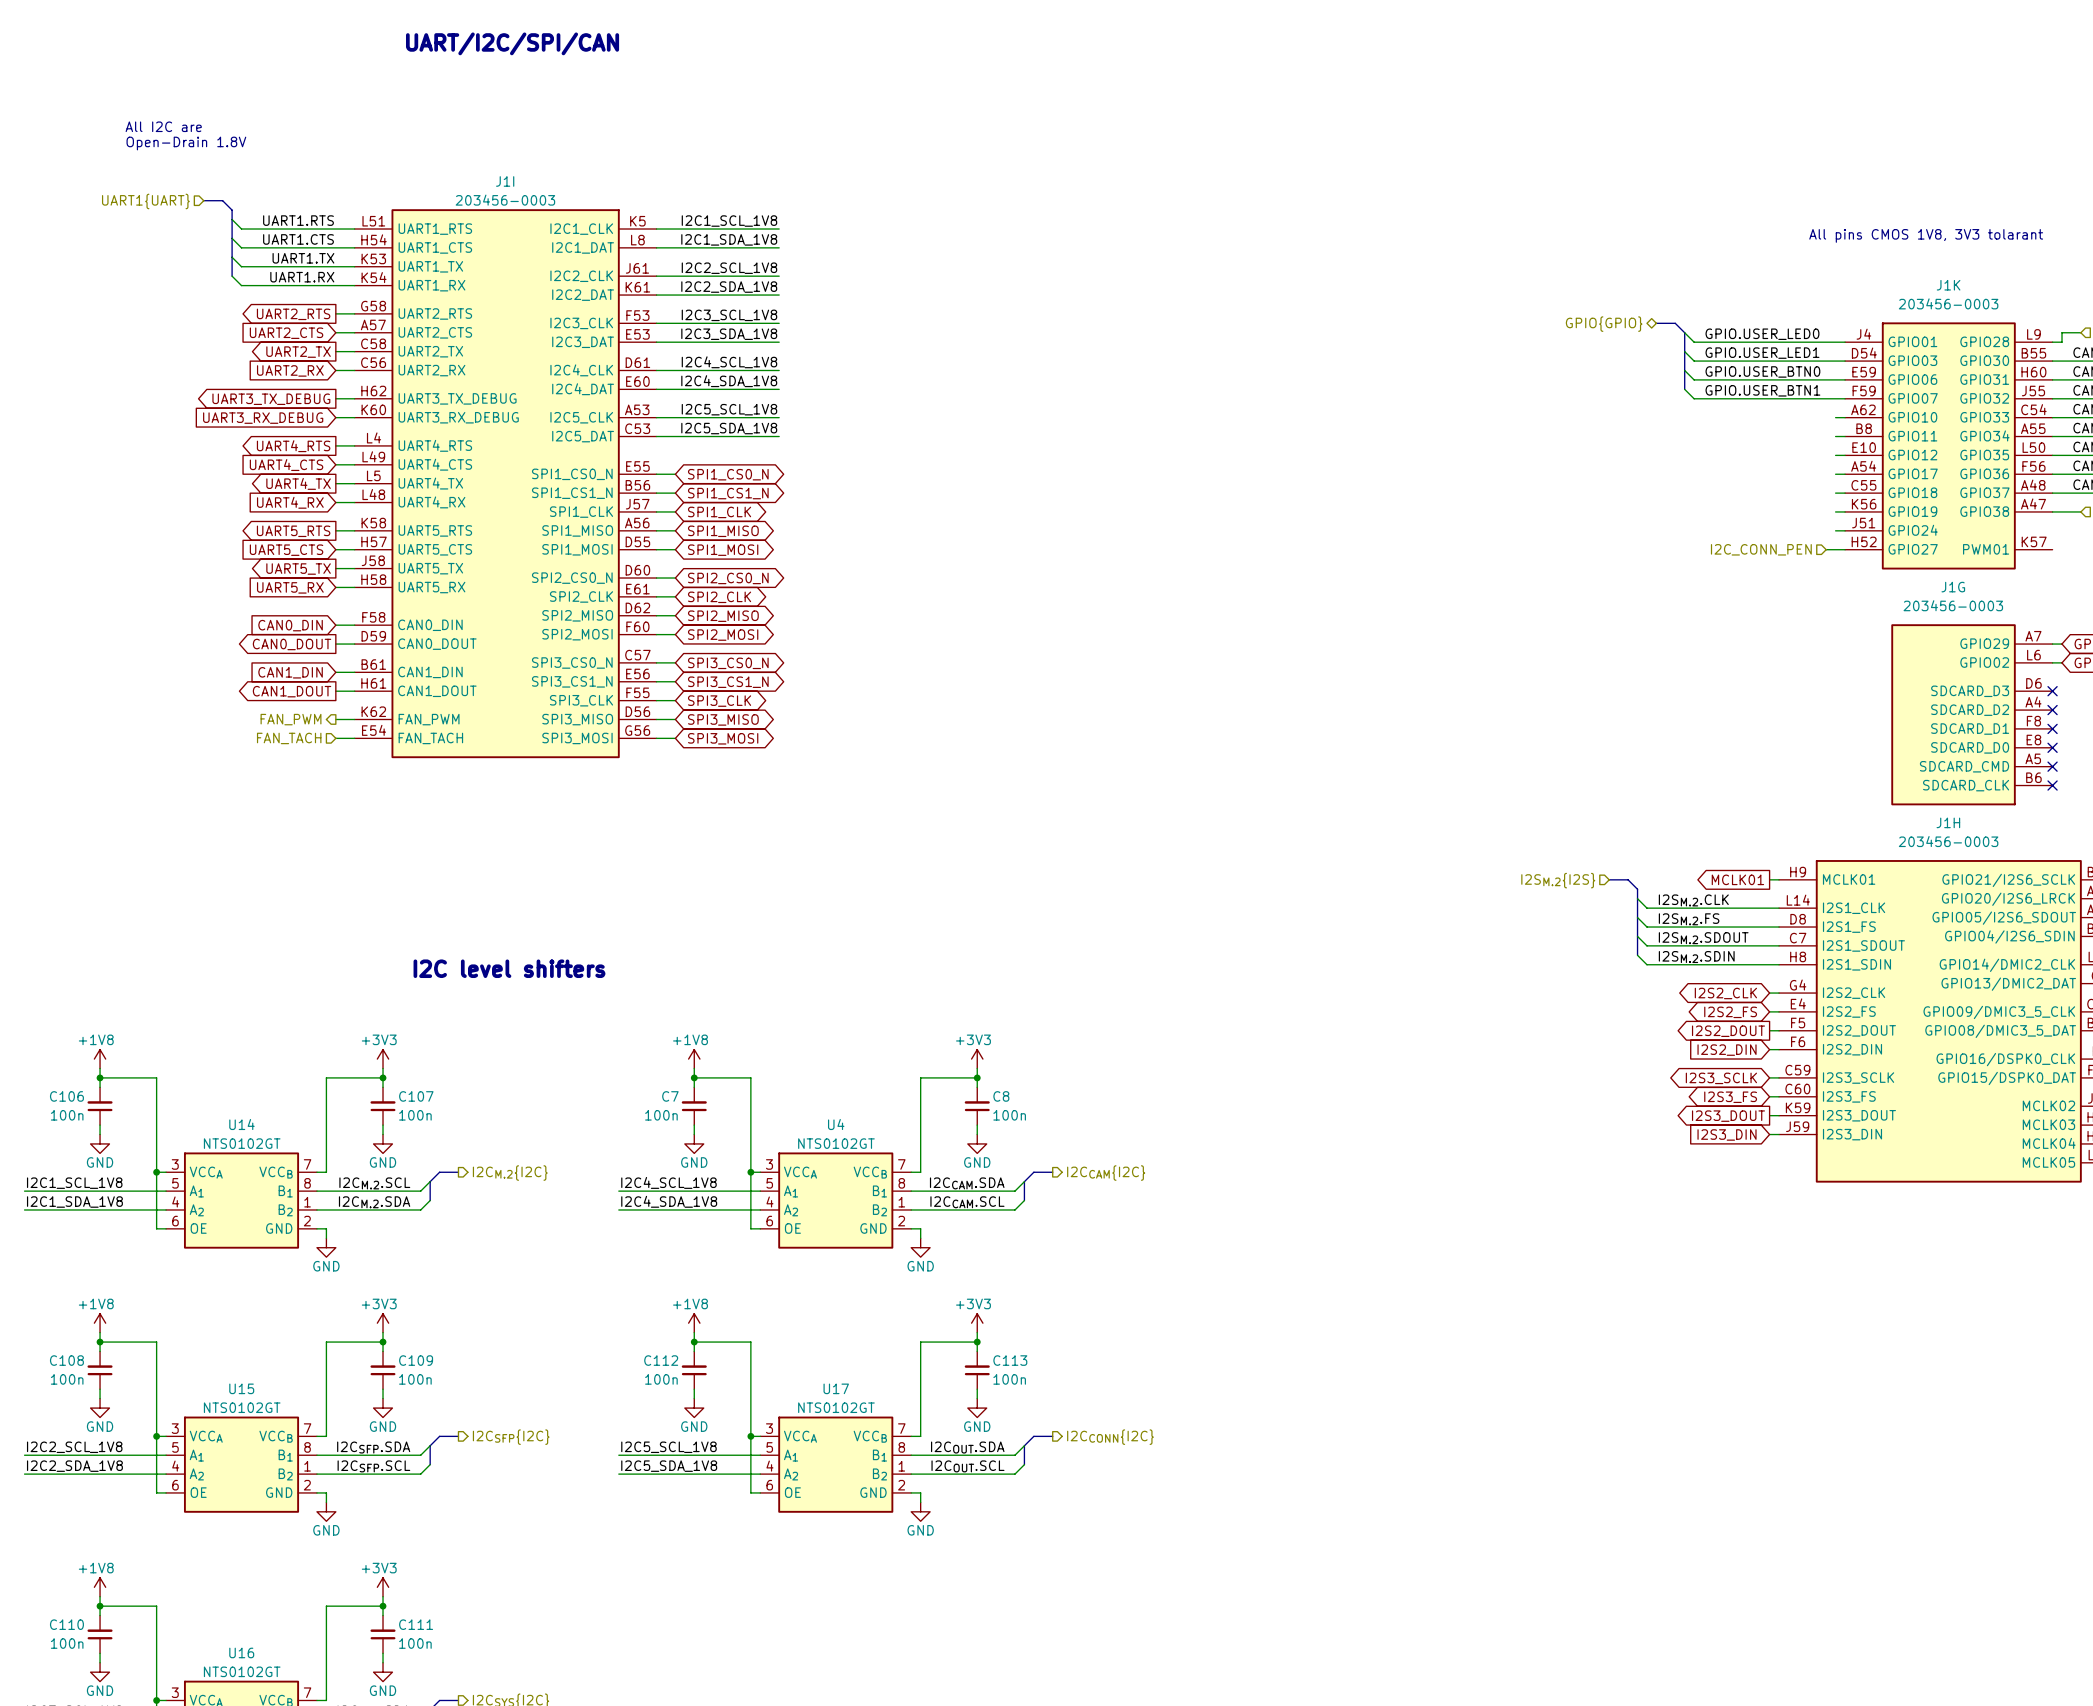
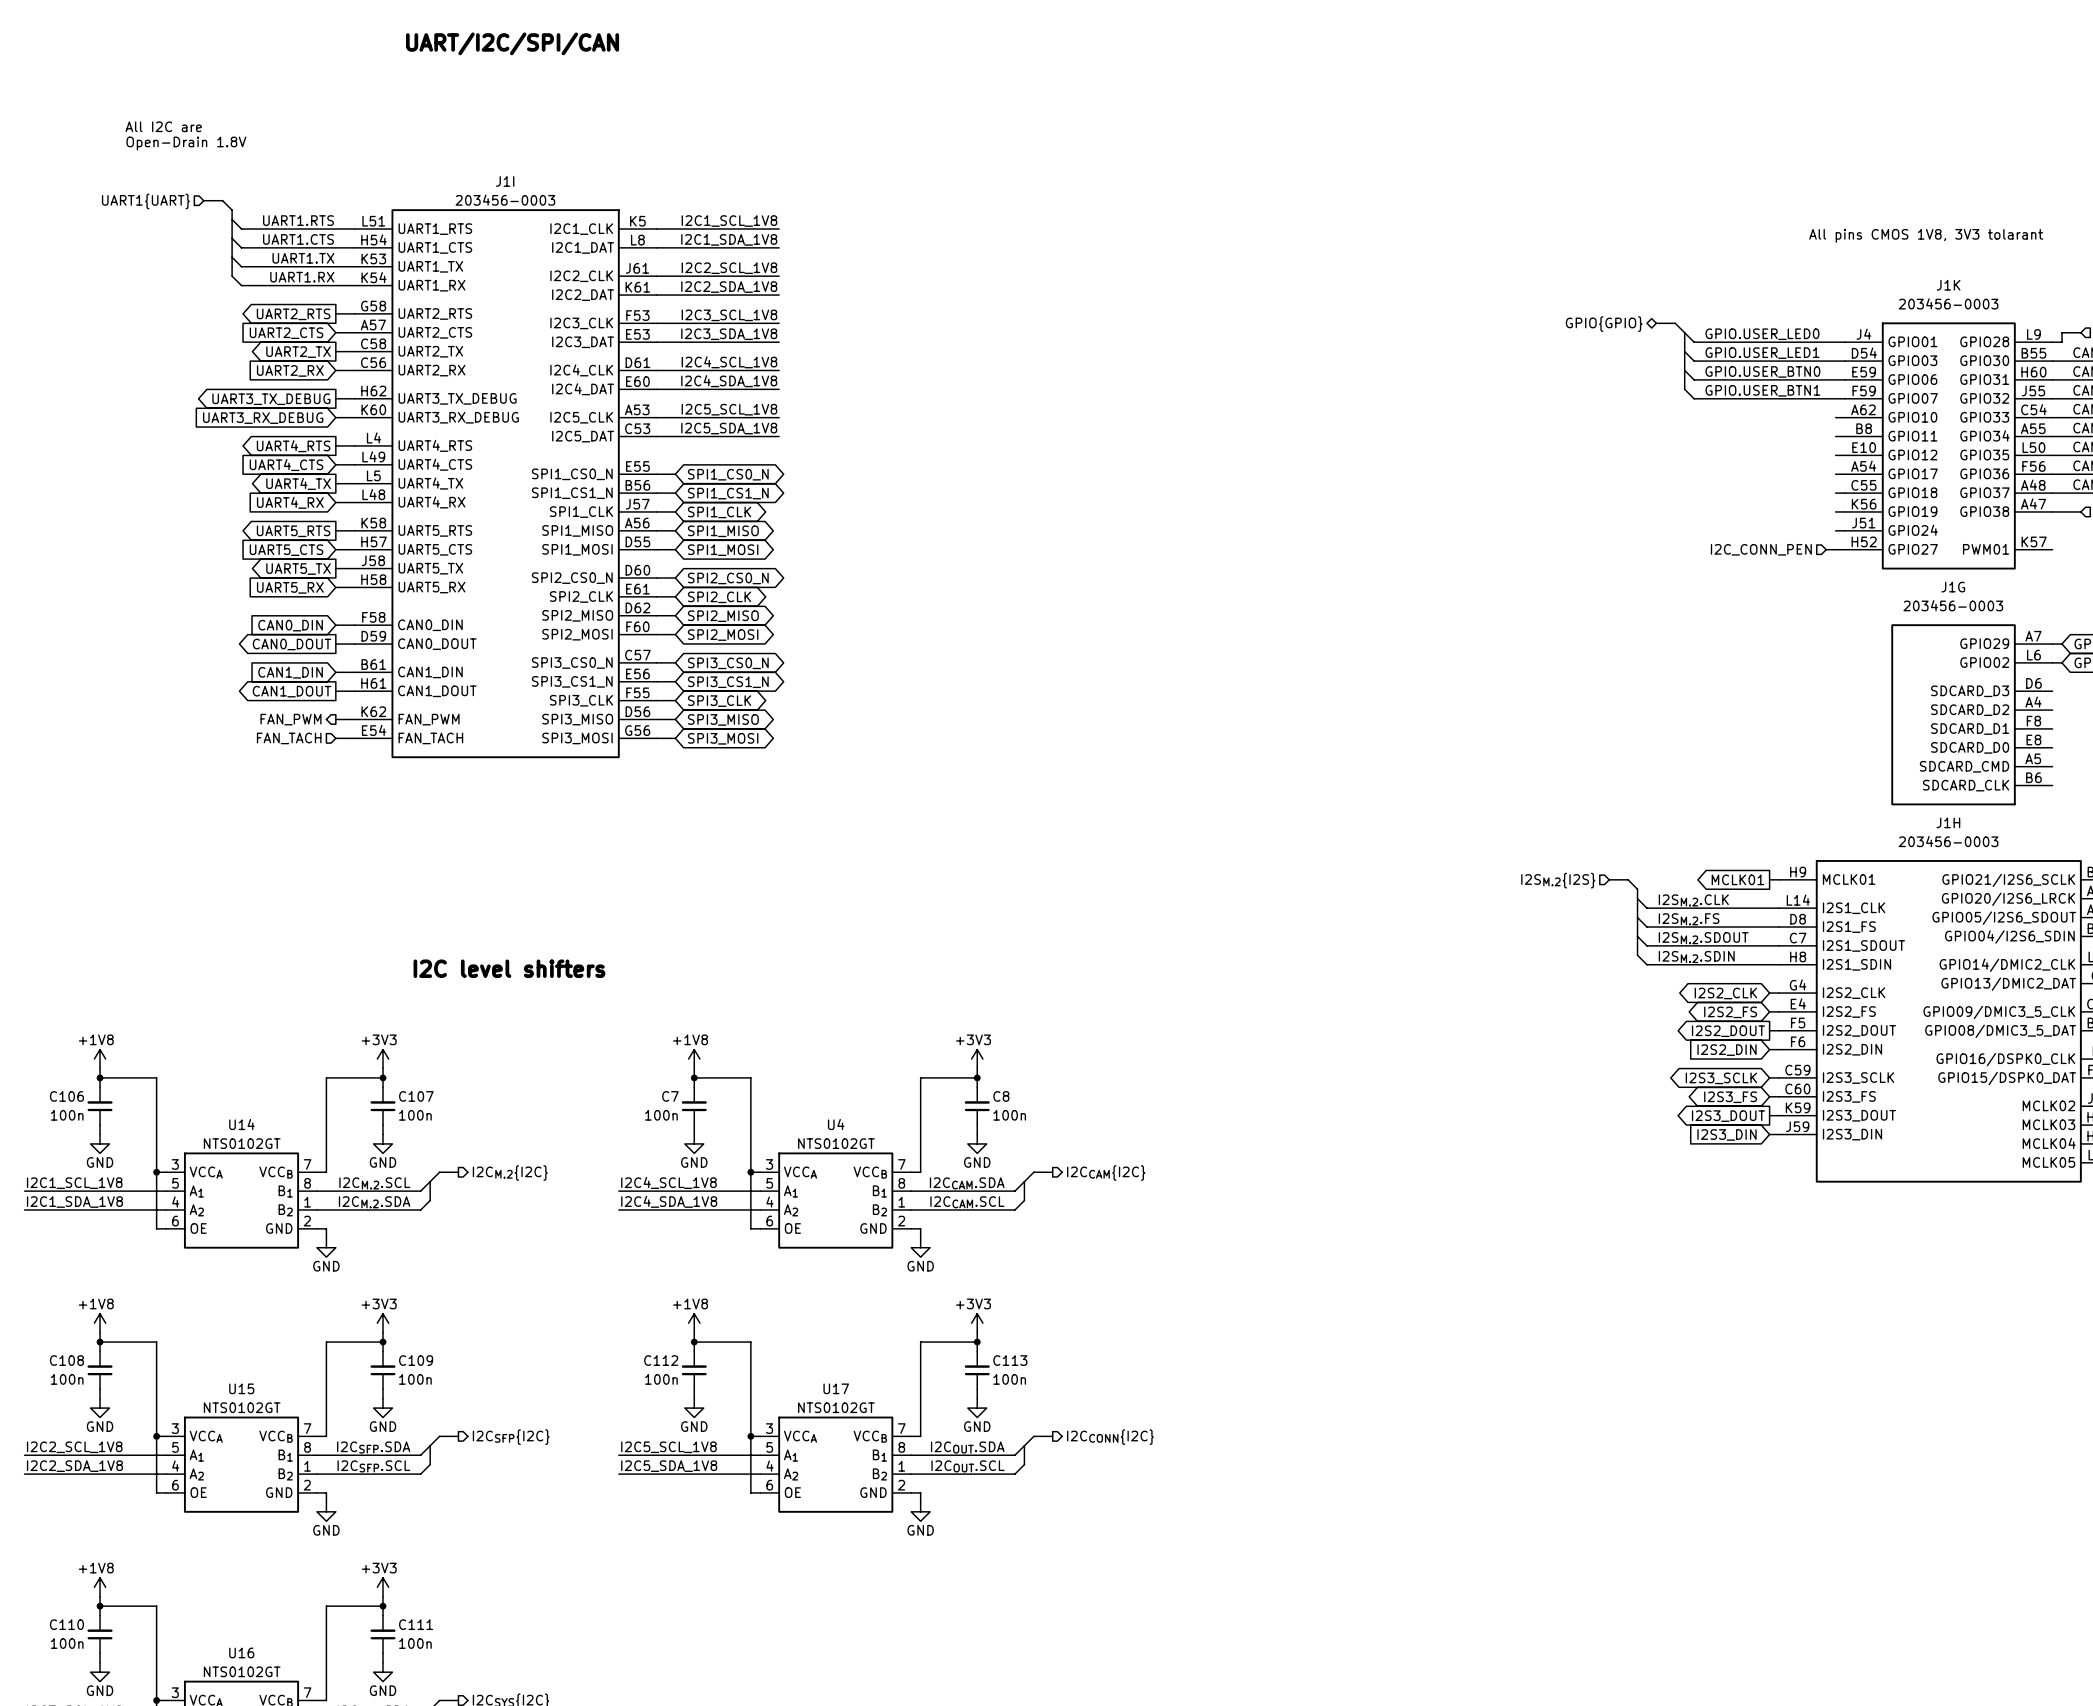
no-connect mark: (2052, 691) -> none
no-connect mark: (2052, 710) -> none
no-connect mark: (2052, 728) -> none
no-connect mark: (2052, 747) -> none
no-connect mark: (2052, 766) -> none
no-connect mark: (2052, 785) -> none

